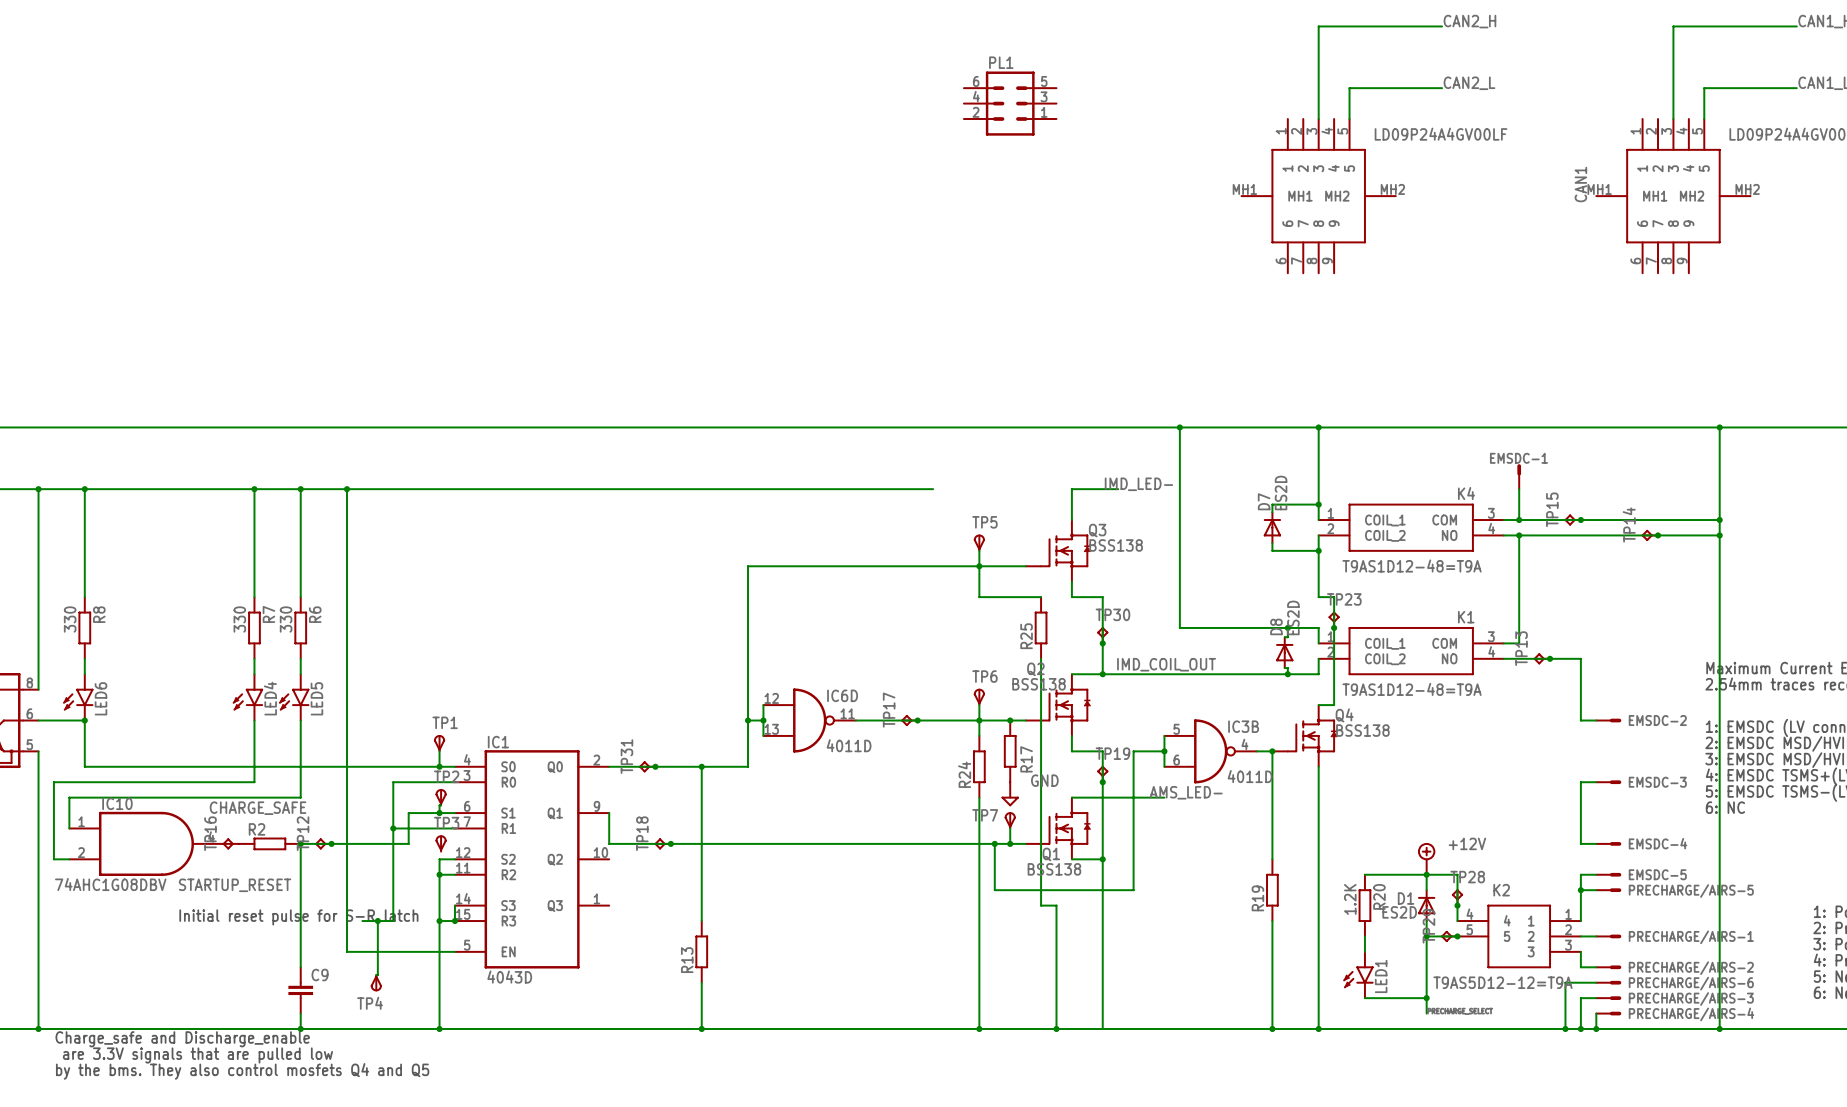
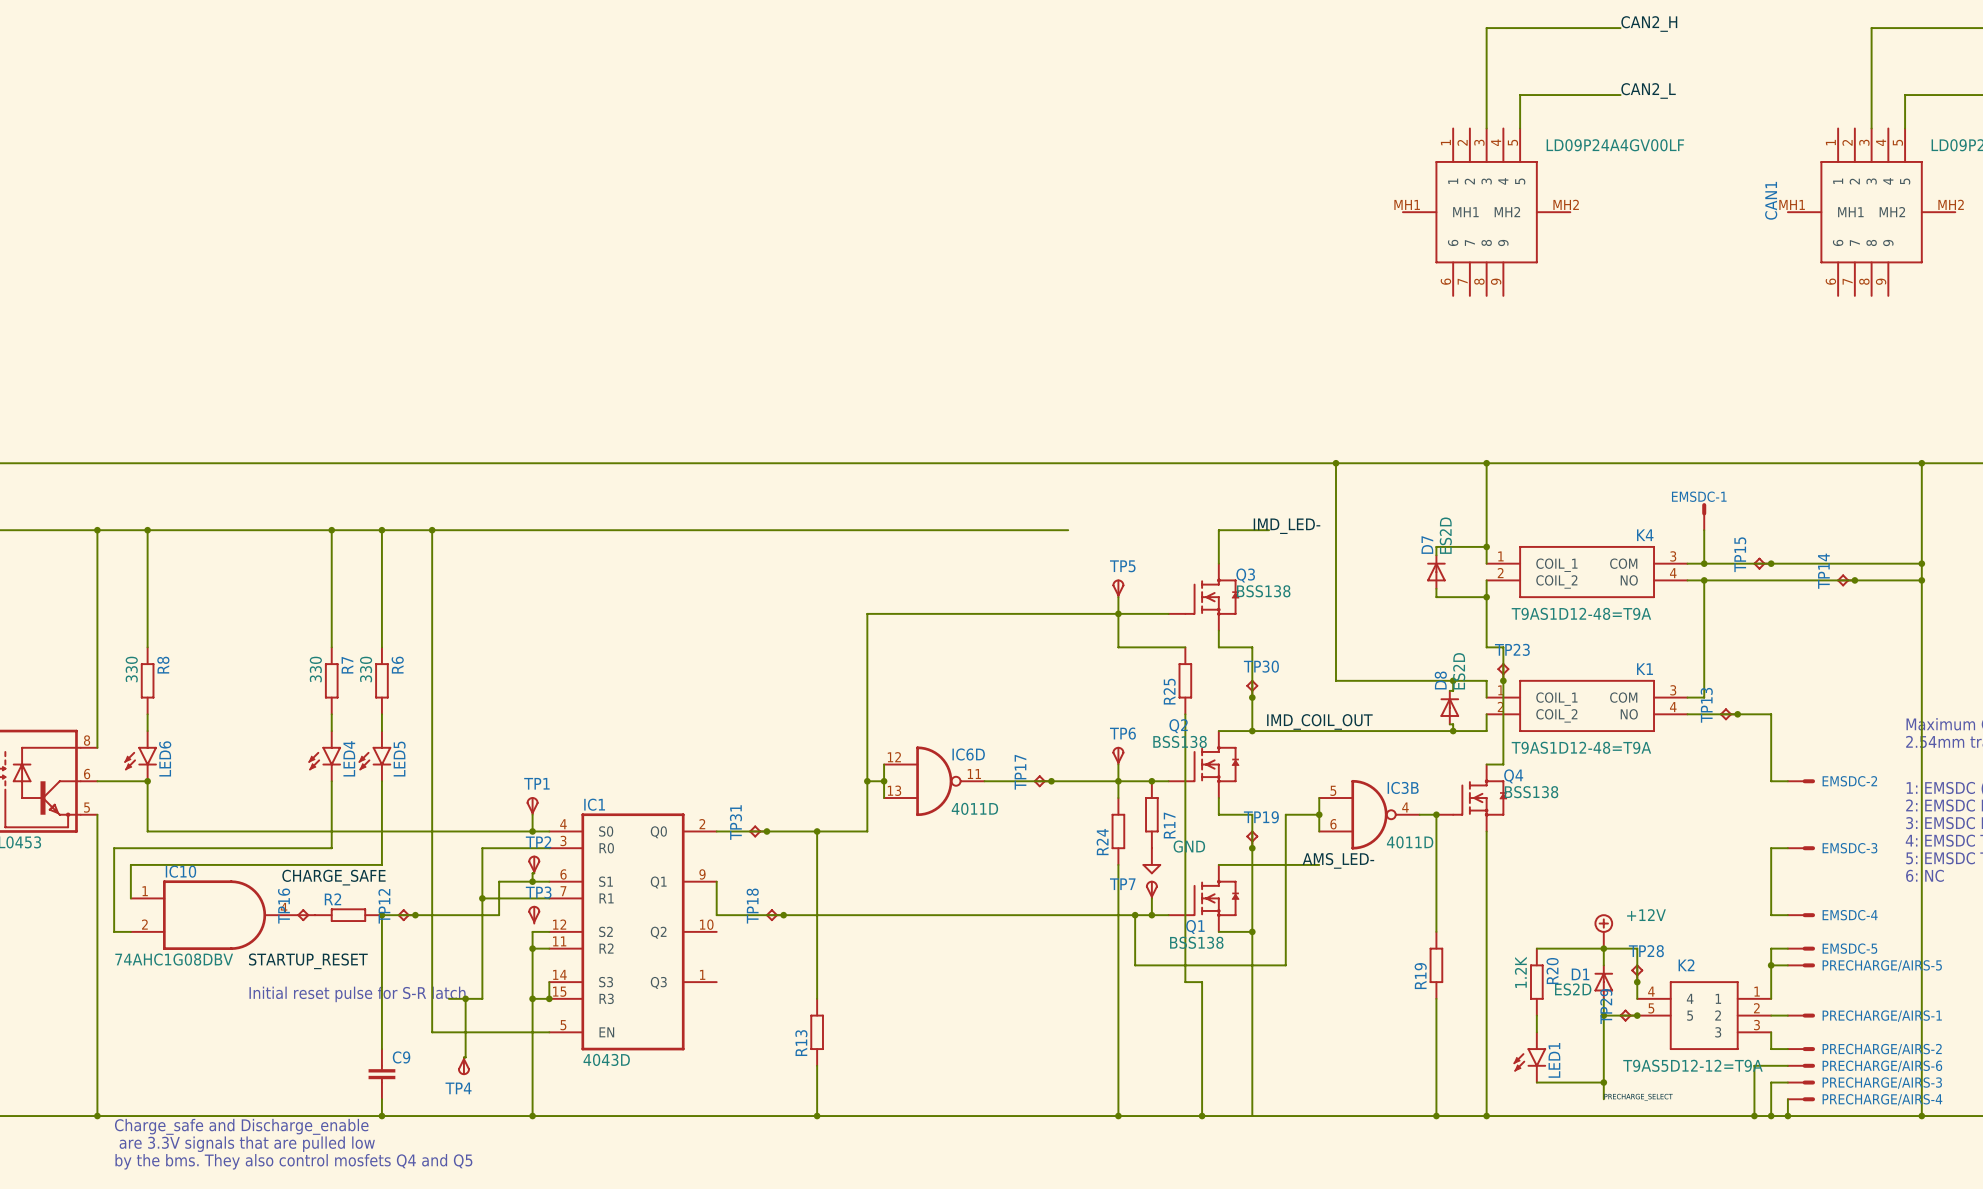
PL1: (1010, 103) -> none

